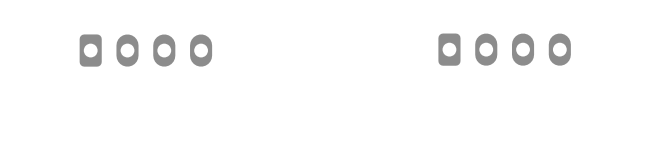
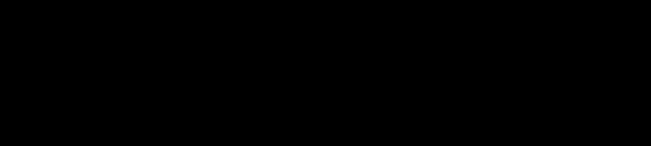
part: (504, 49) -> none
part: (145, 50) -> none

